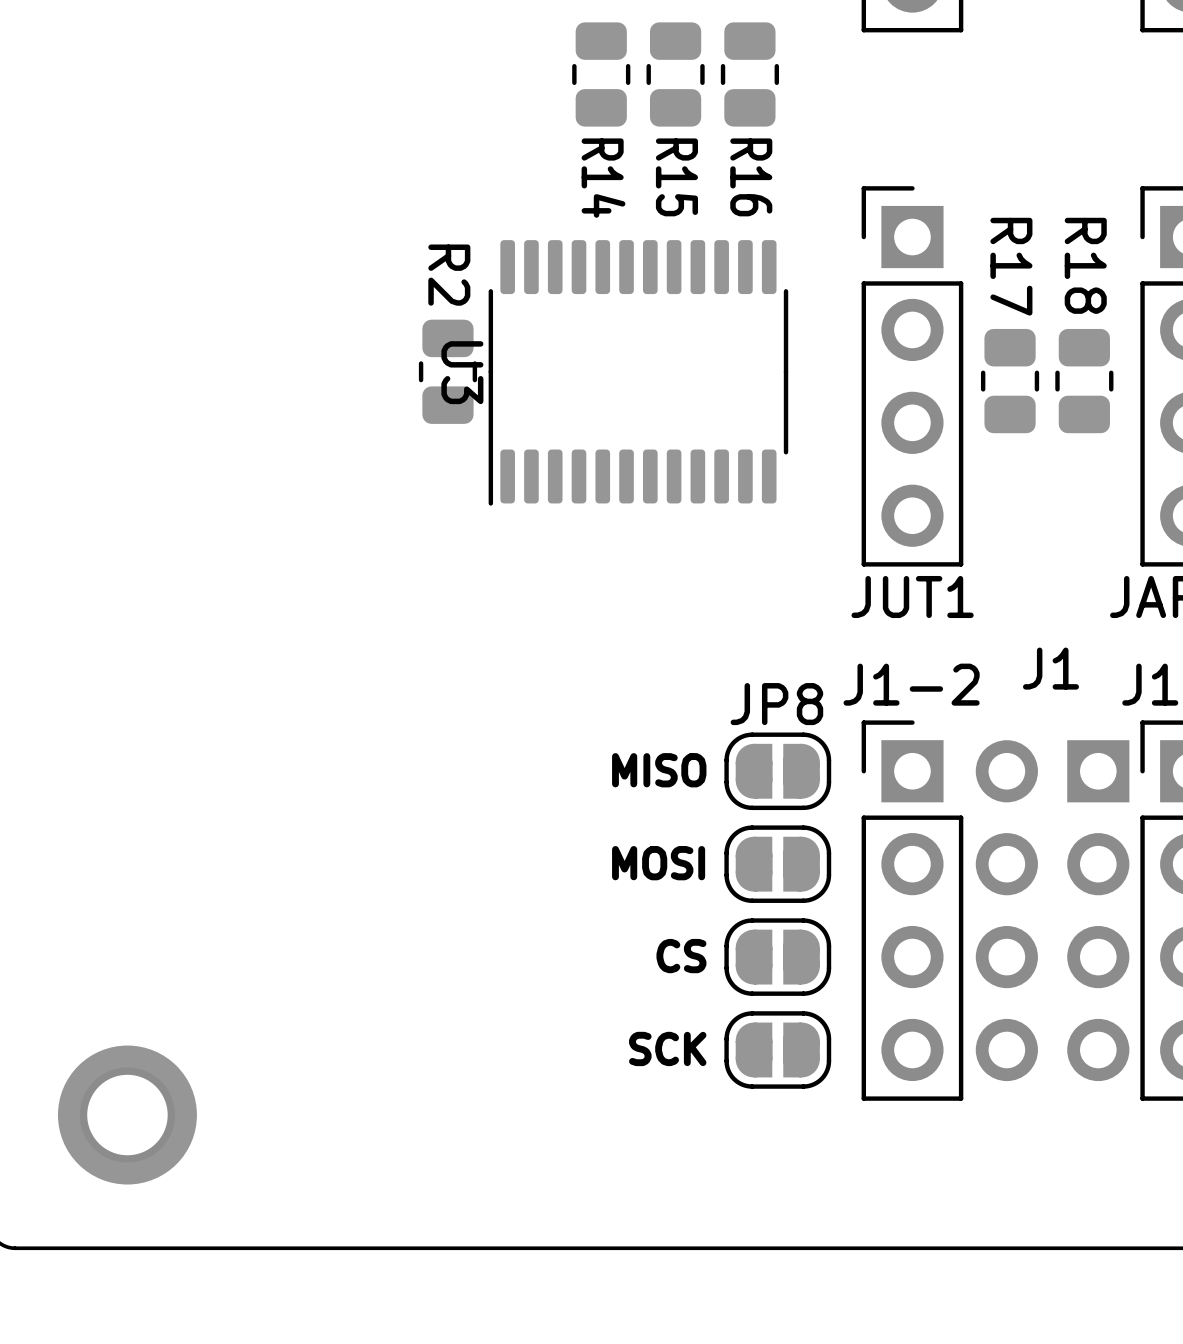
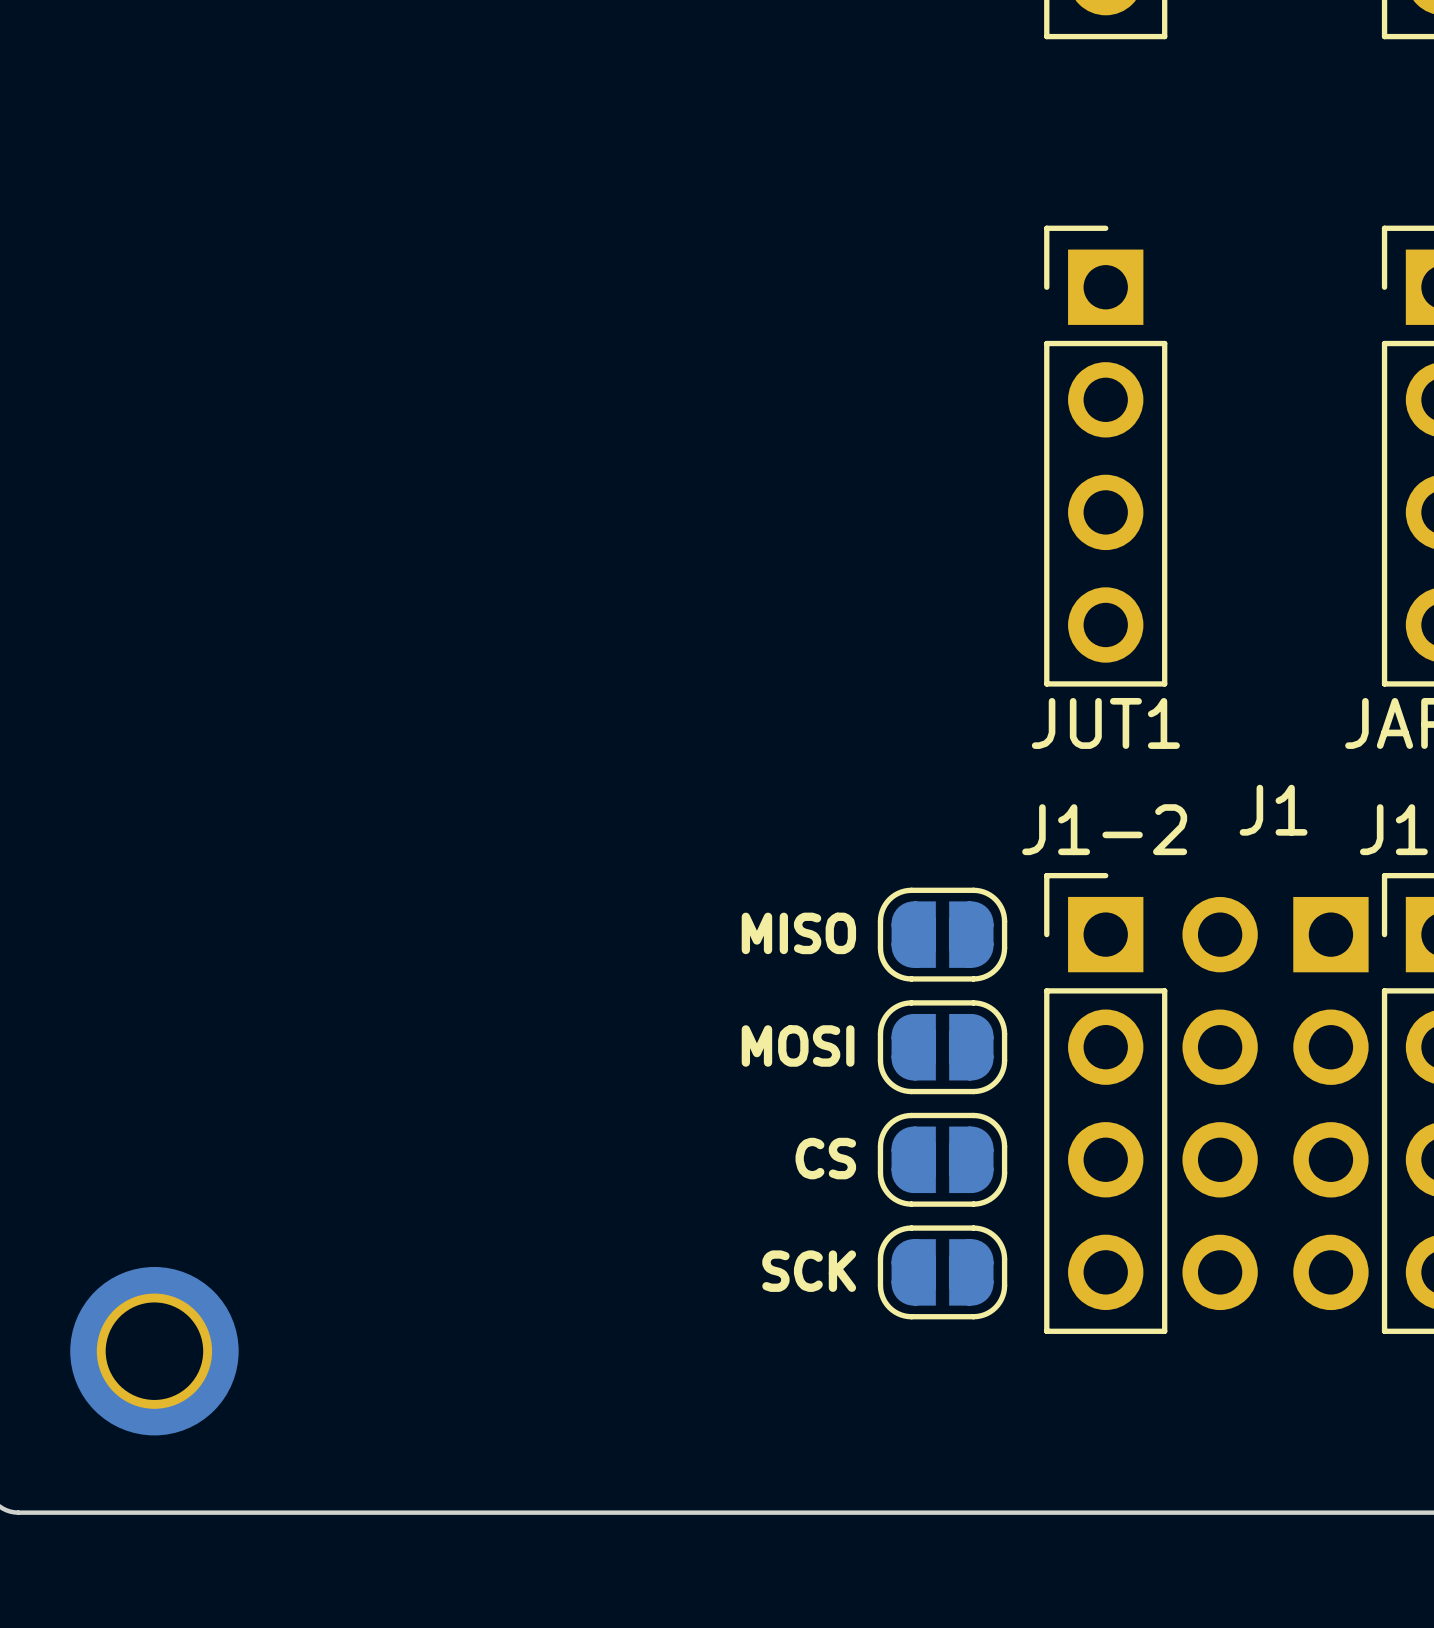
R14: (601, 74) -> none
R15: (675, 74) -> none
R16: (749, 74) -> none
R2: (447, 371) -> none
U3: (638, 372) -> none
R17: (1010, 381) -> none
R18: (1084, 381) -> none
JP8 name: JP8 (776, 704) -> none

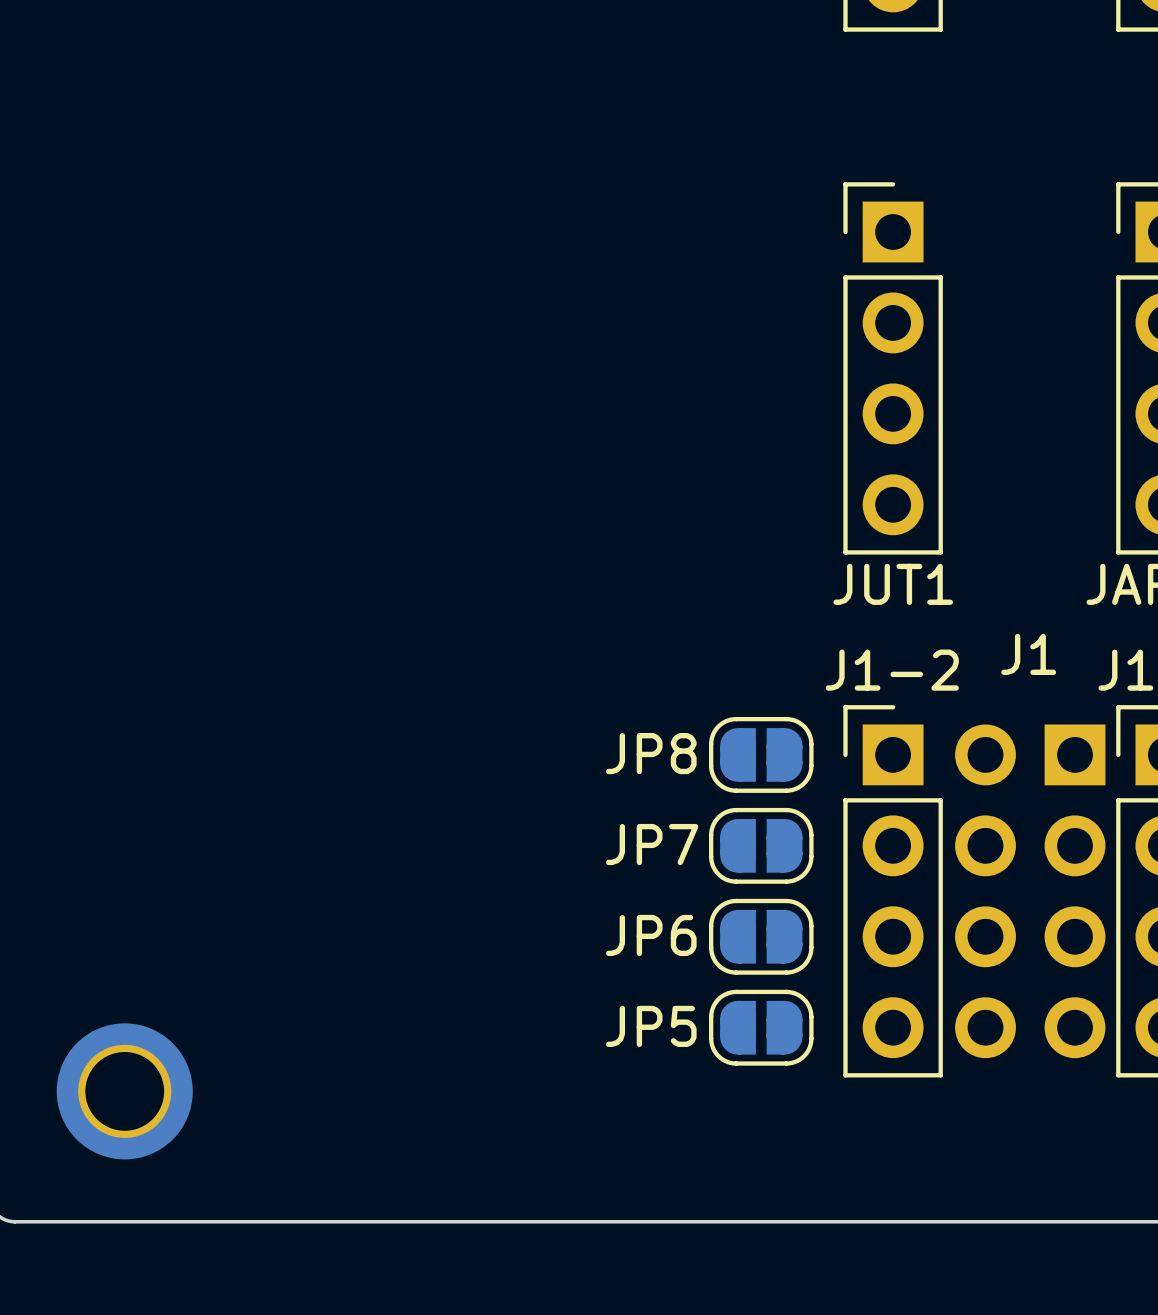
JP8 name: none -> JP8 (651, 753)
text: MISO (798, 933) -> none
text: MOSI (798, 1045) -> none
JP7 name: none -> JP7 (652, 844)
JP6 name: none -> JP6 (651, 935)
text: CS (825, 1158) -> none
JP5 name: none -> JP5 (651, 1026)
text: SCK (809, 1271) -> none

